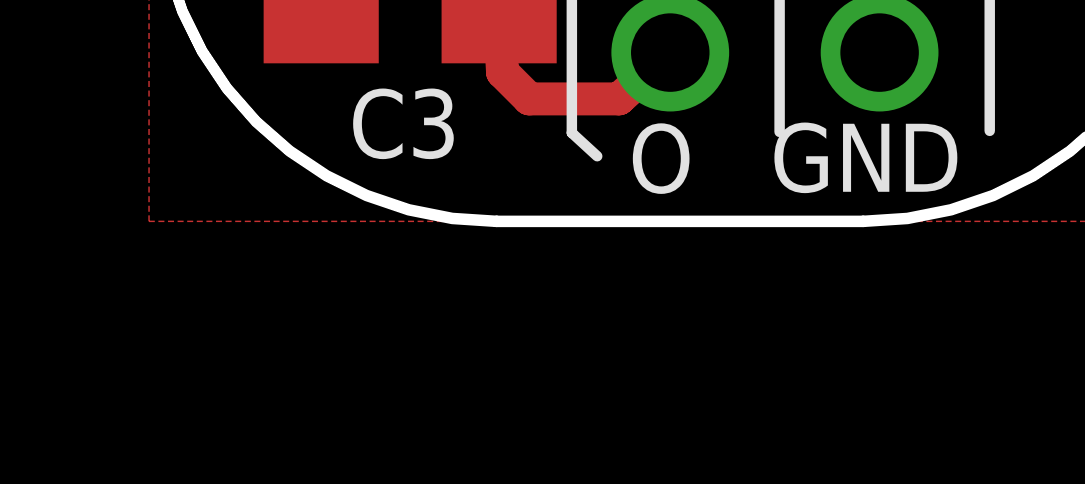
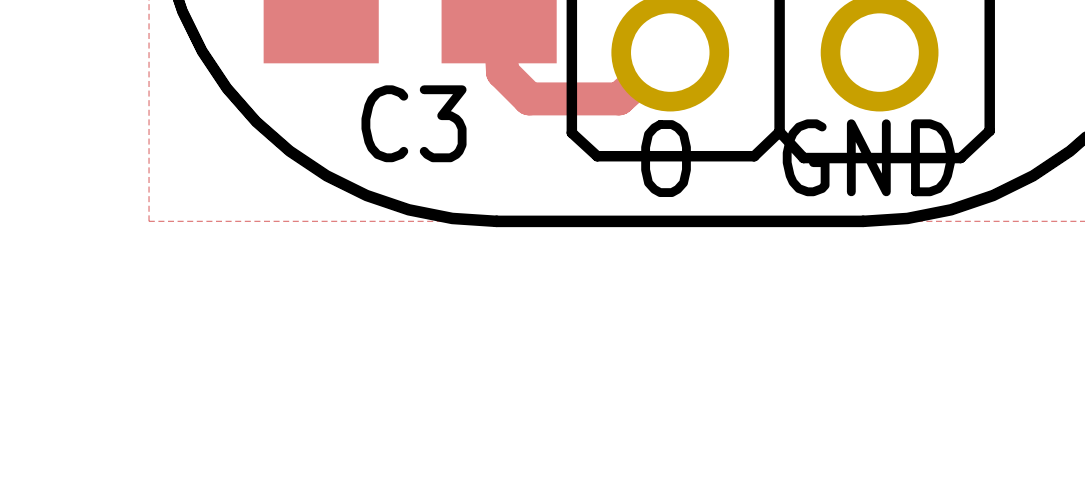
line: none -> (989, 130) (960, 158) (803, 158) (779, 131) (754, 156) (597, 156)

